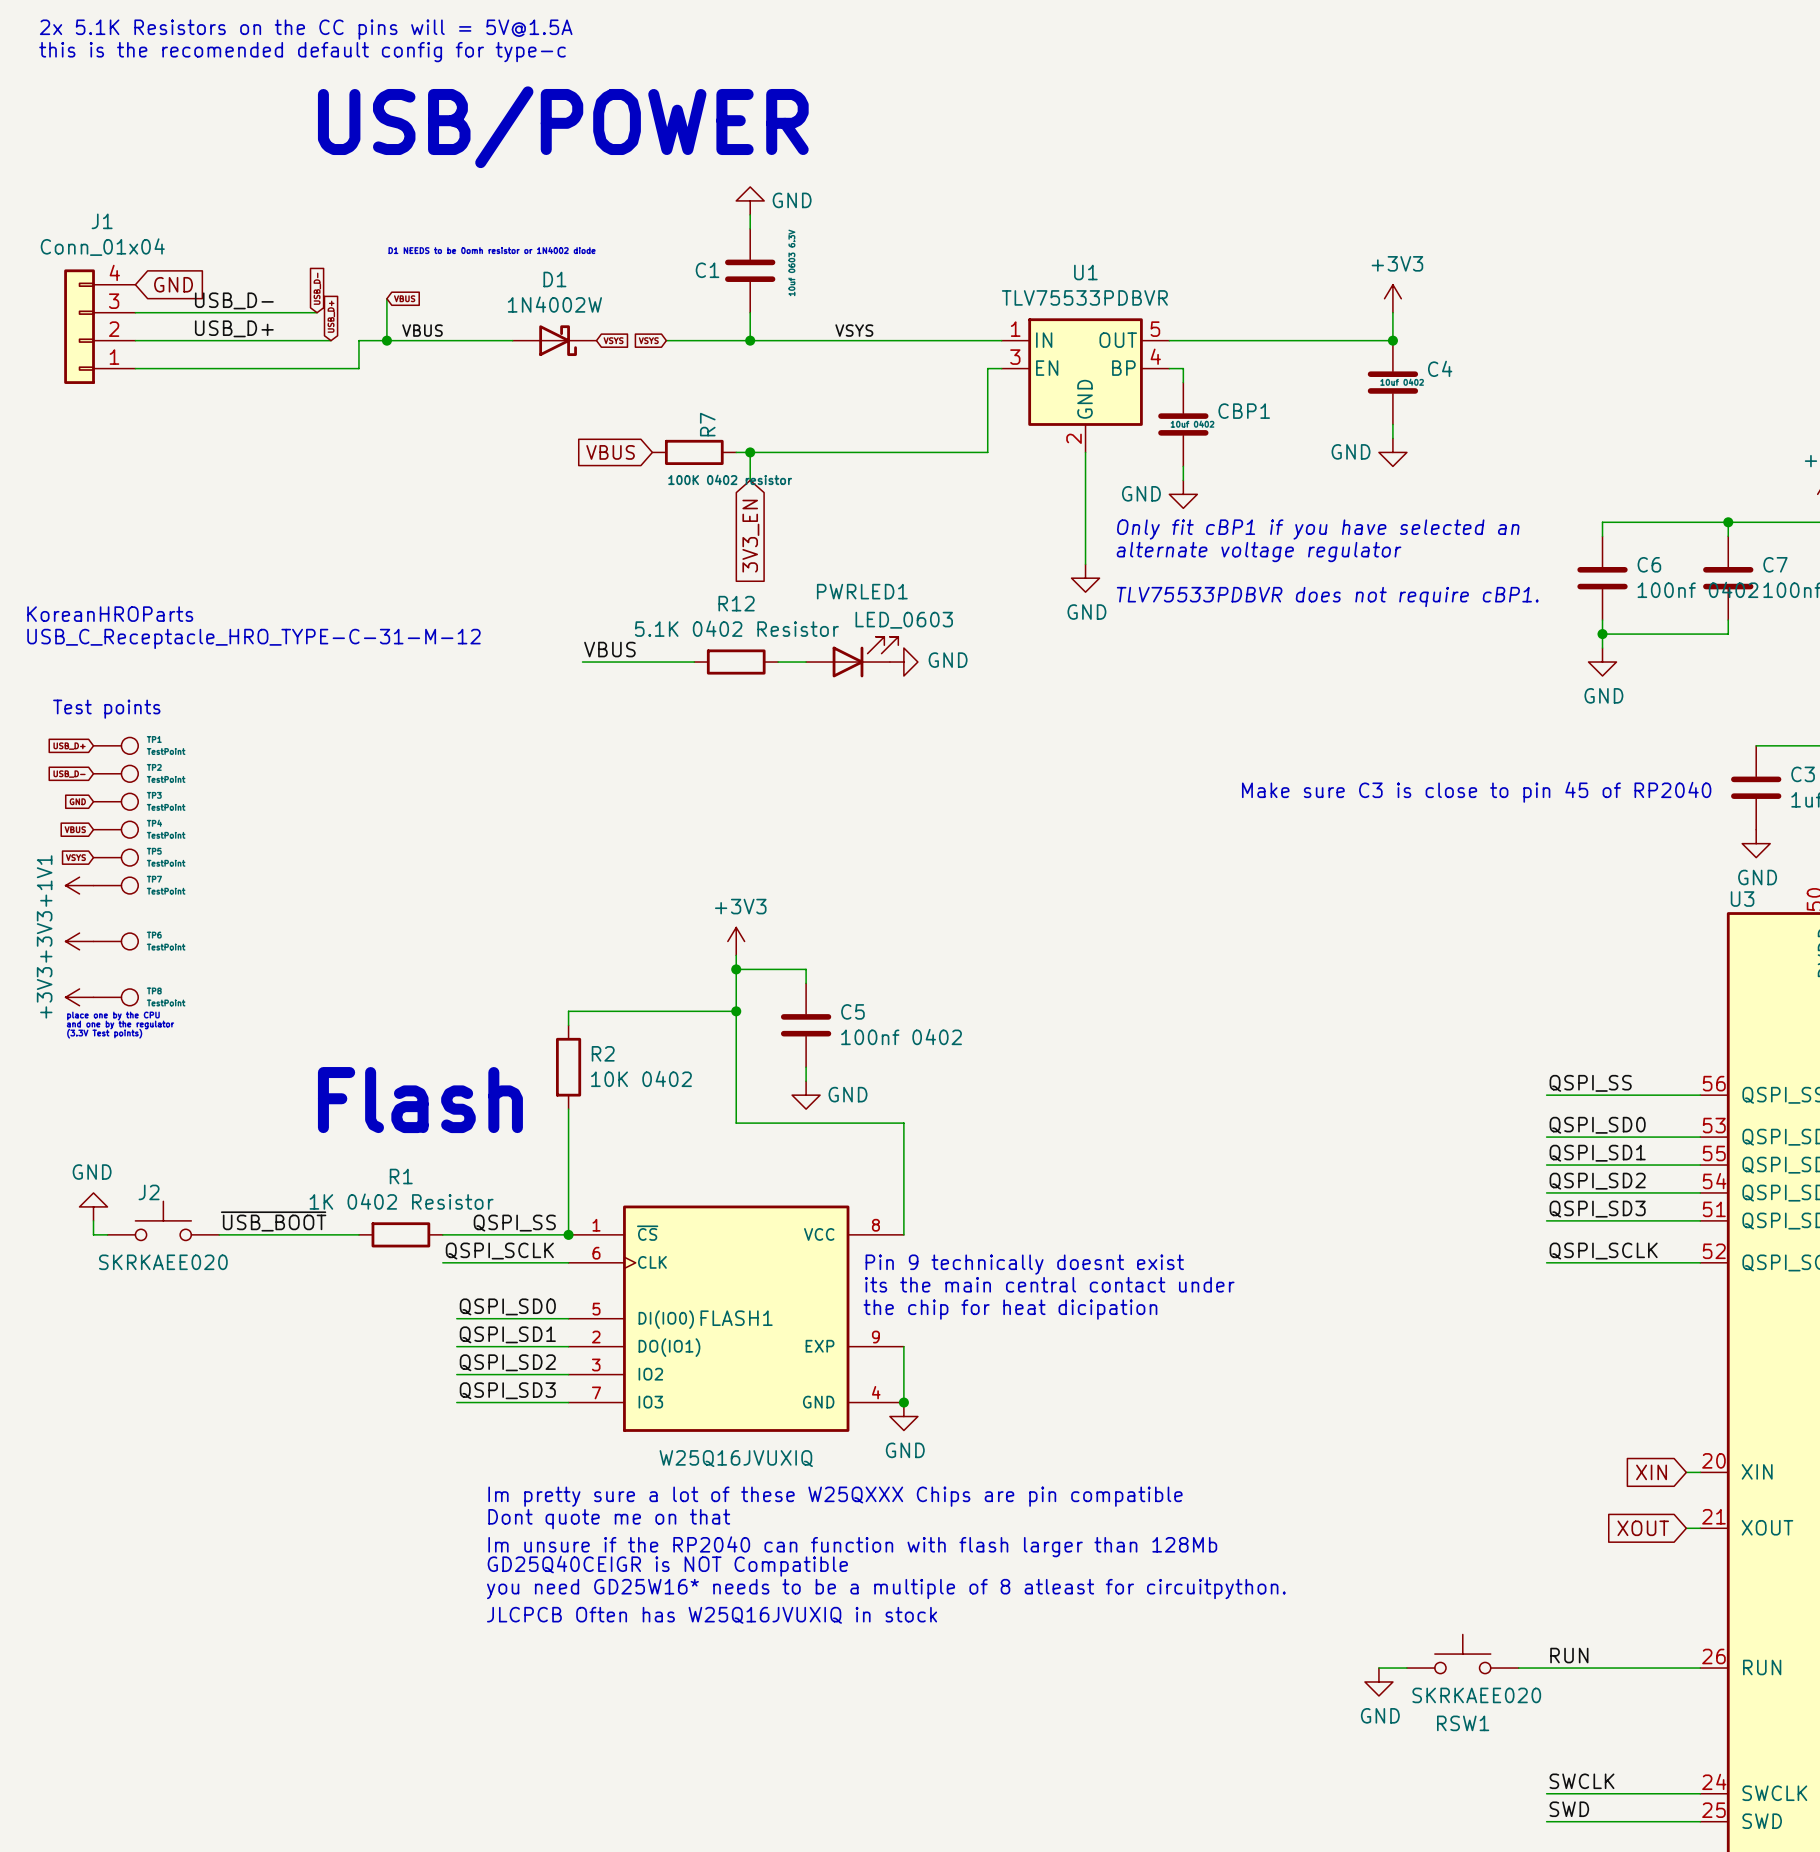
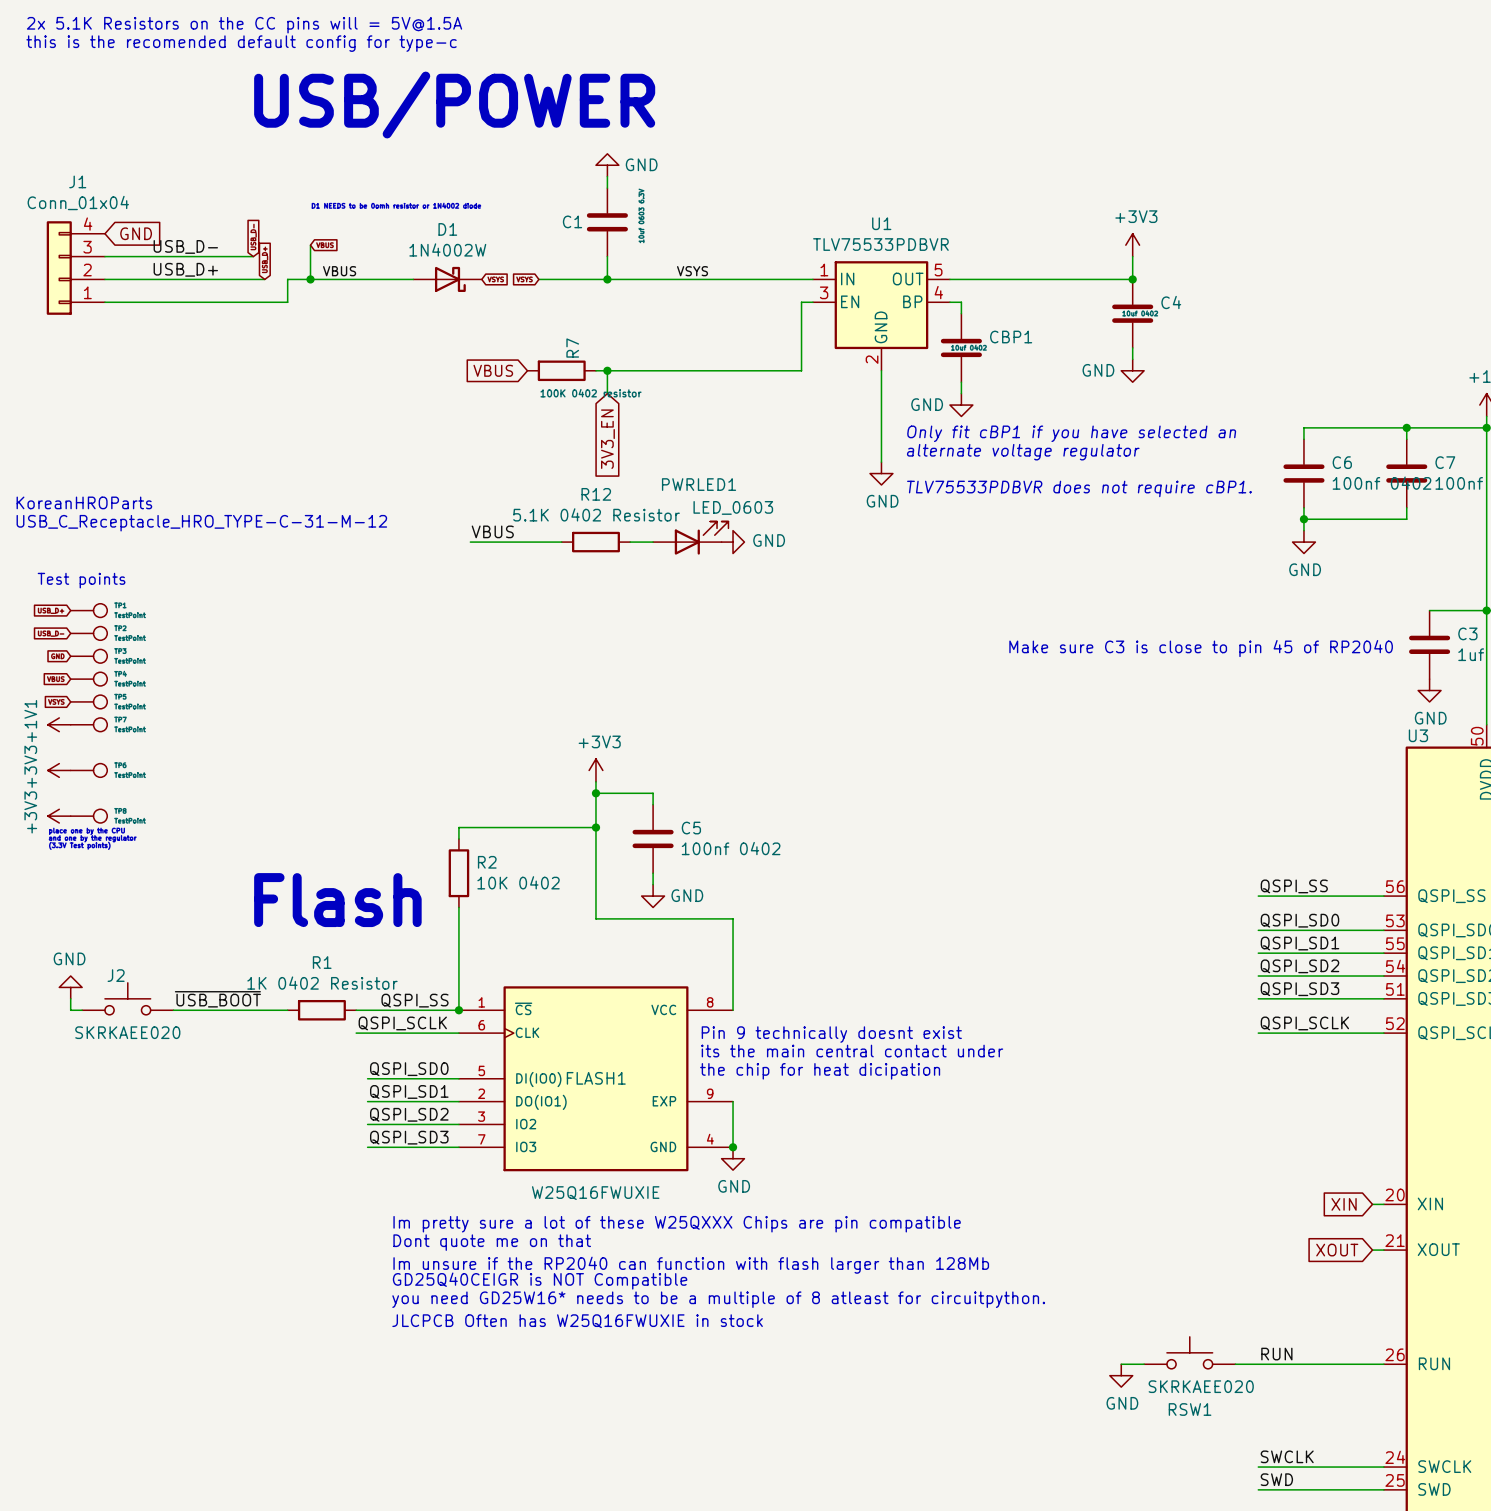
FLASH1 value: W25Q16JVUXIQ (736, 1458) -> W25Q16FWUXIE (595, 1193)
text: JLCPCB Often has W25Q16JVUXIQ in stock (712, 1615) -> JLCPCB Often has W25Q16FWUXIE in stock (577, 1321)

